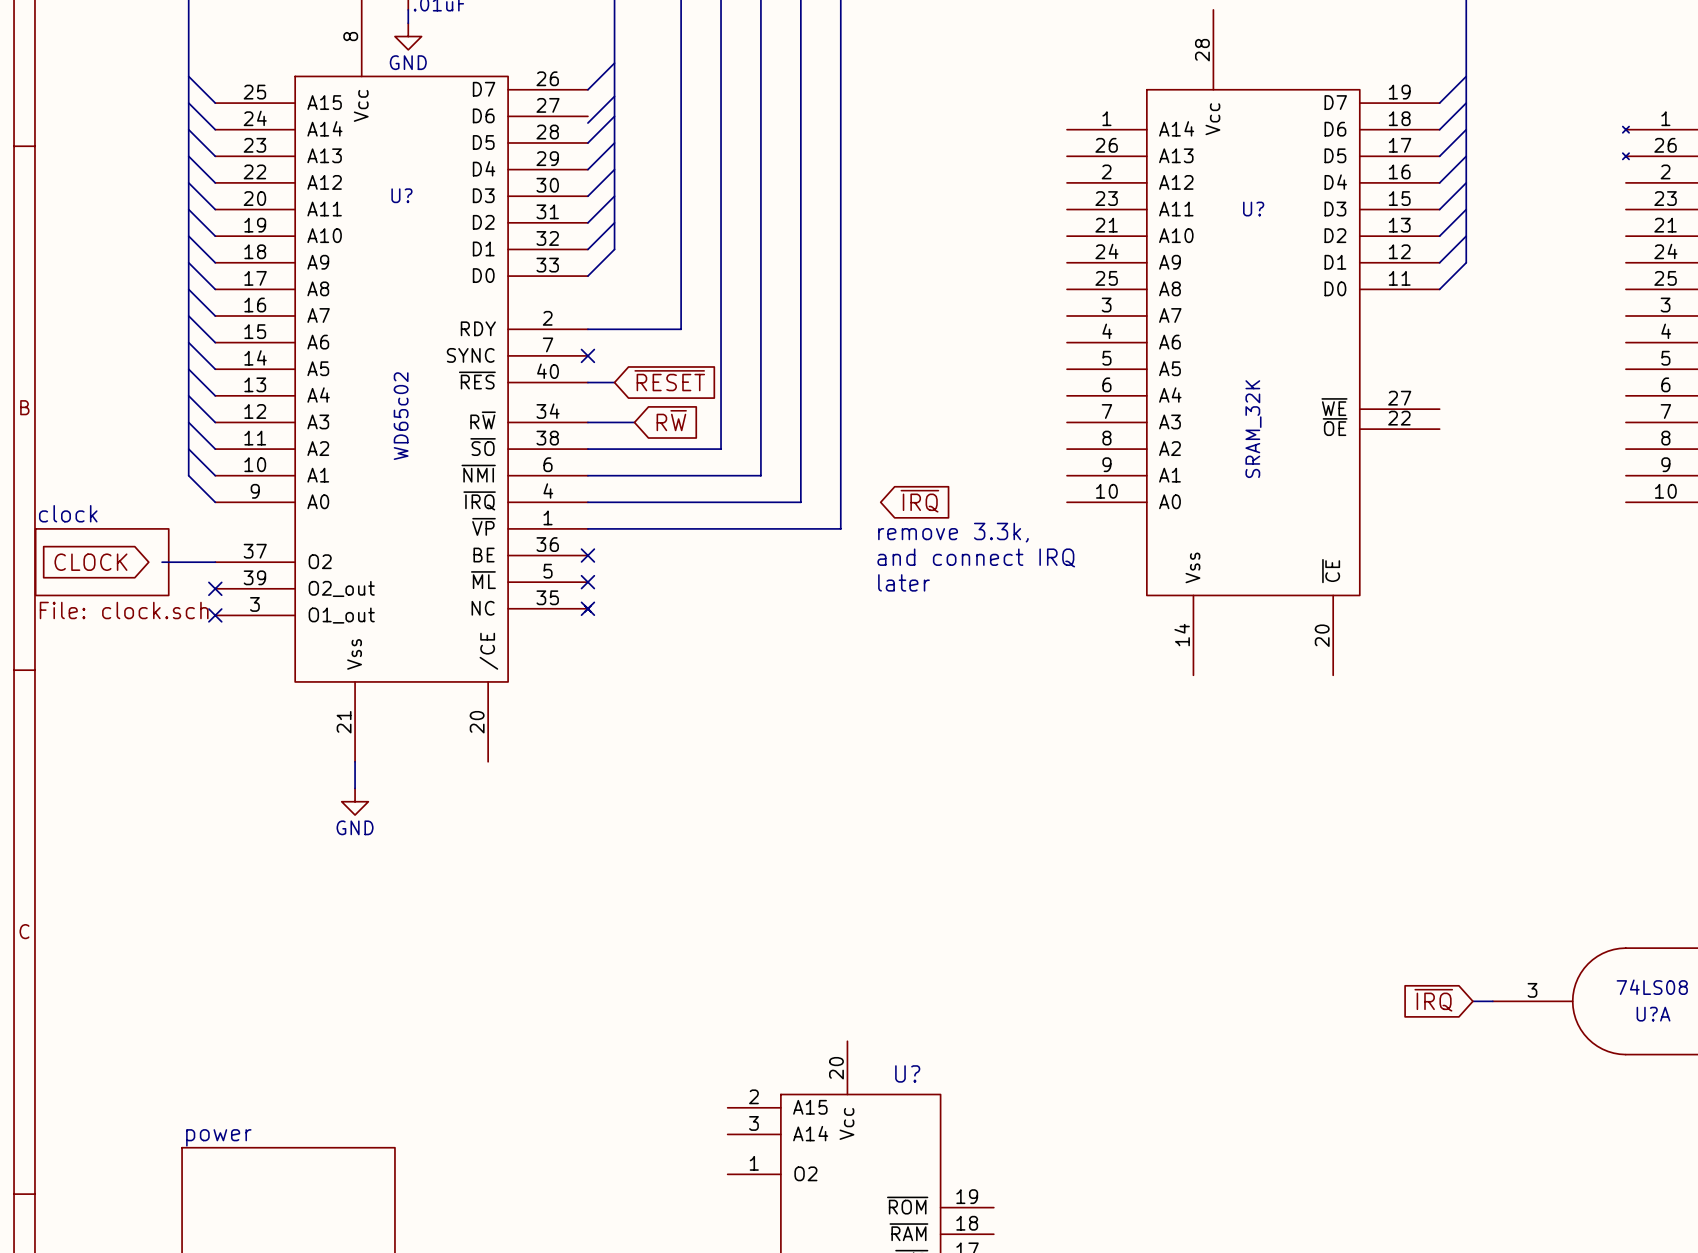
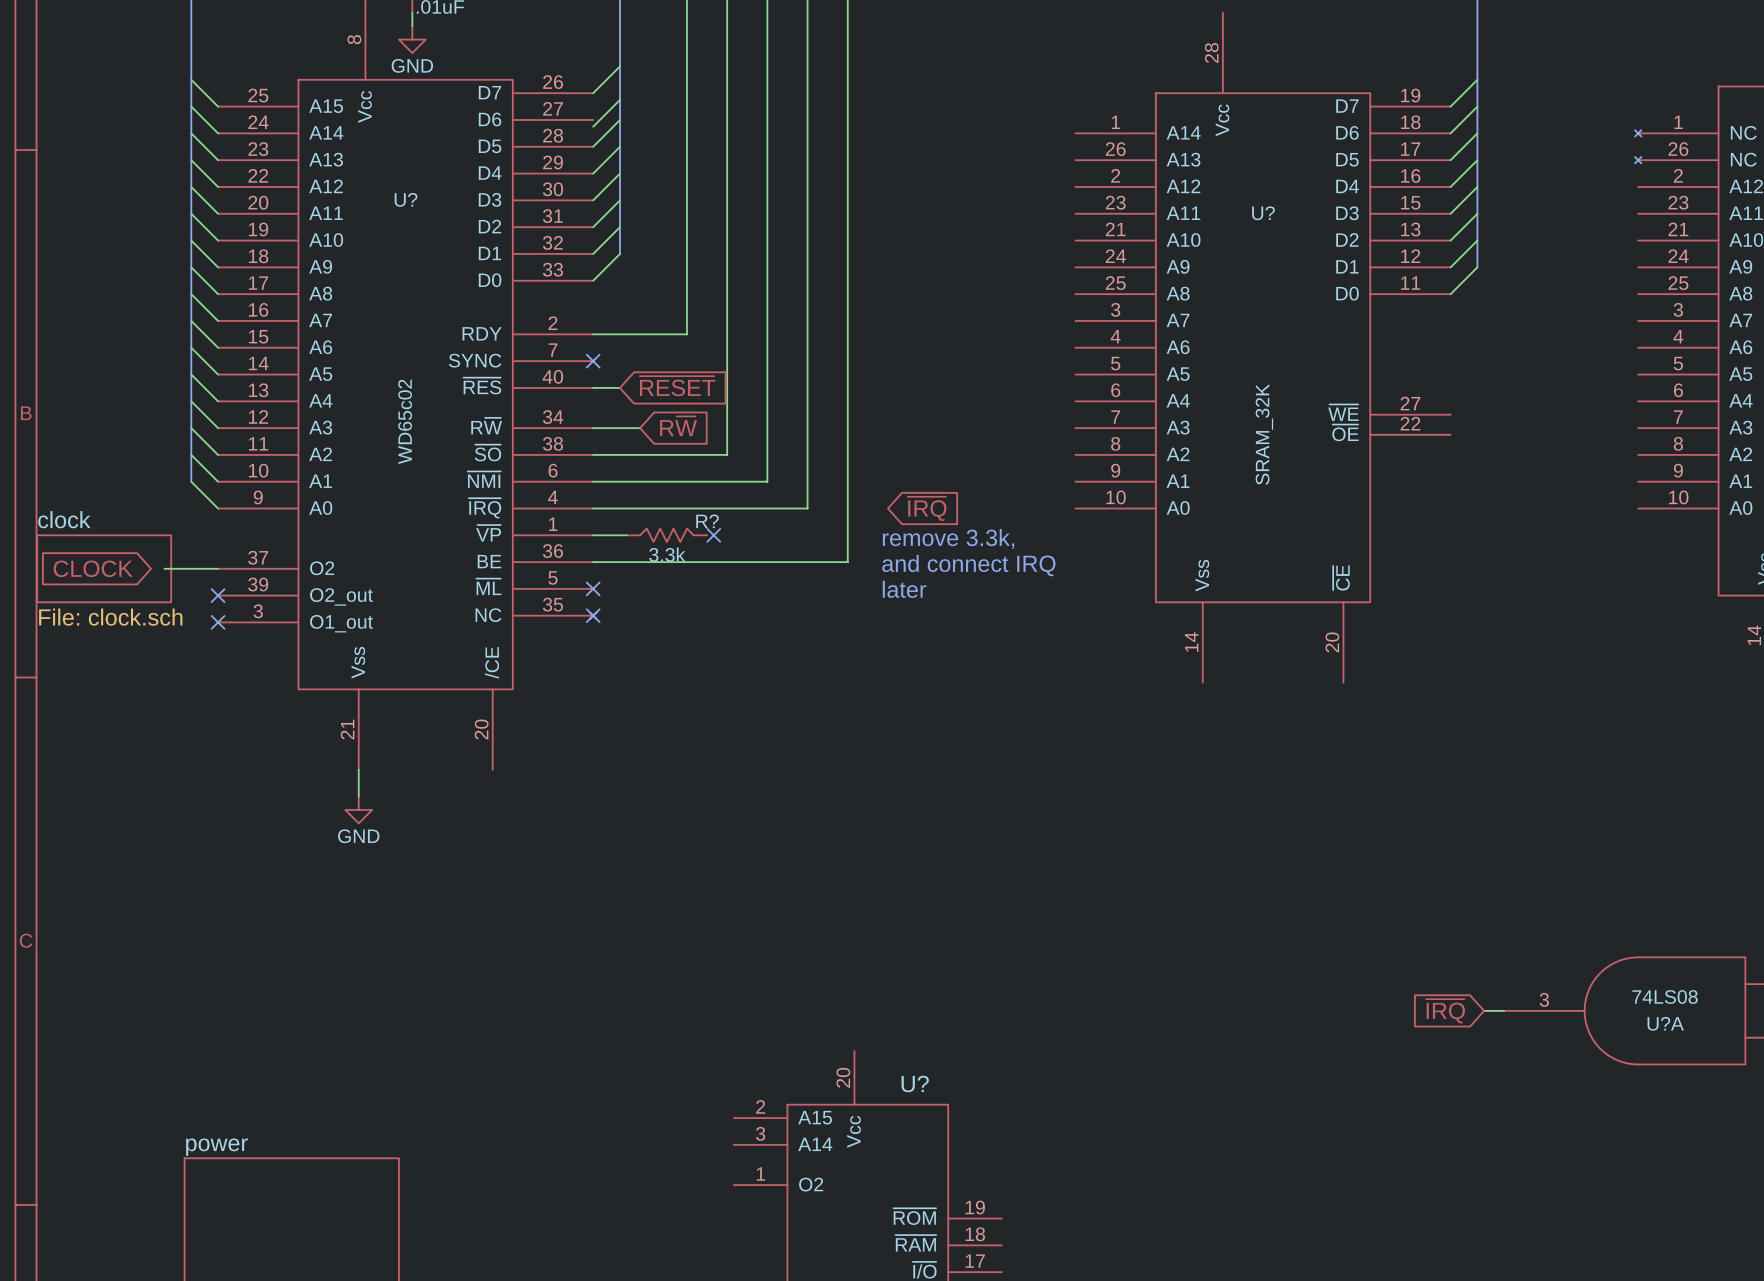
wire: (621, 528) (840, 528) -> (593, 562) (847, 562) (847, 535)
R?: none -> 3.3k (666, 535)
no-connect mark: none -> (713, 535)
no-connect mark: (587, 555) -> none

